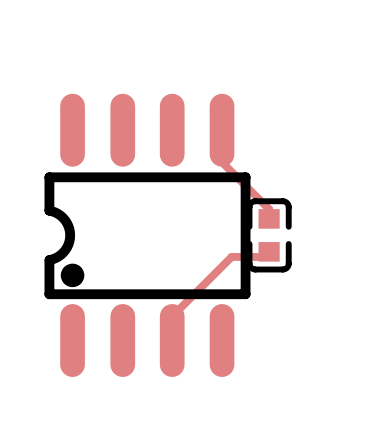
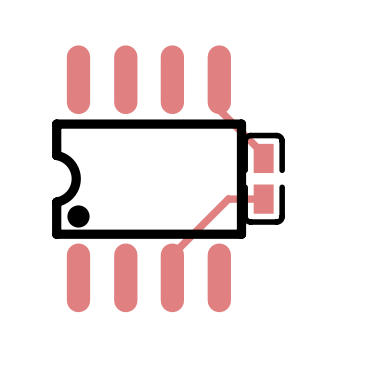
part footprint: [246, 198, 292, 273] -> [242, 132, 285, 225]

